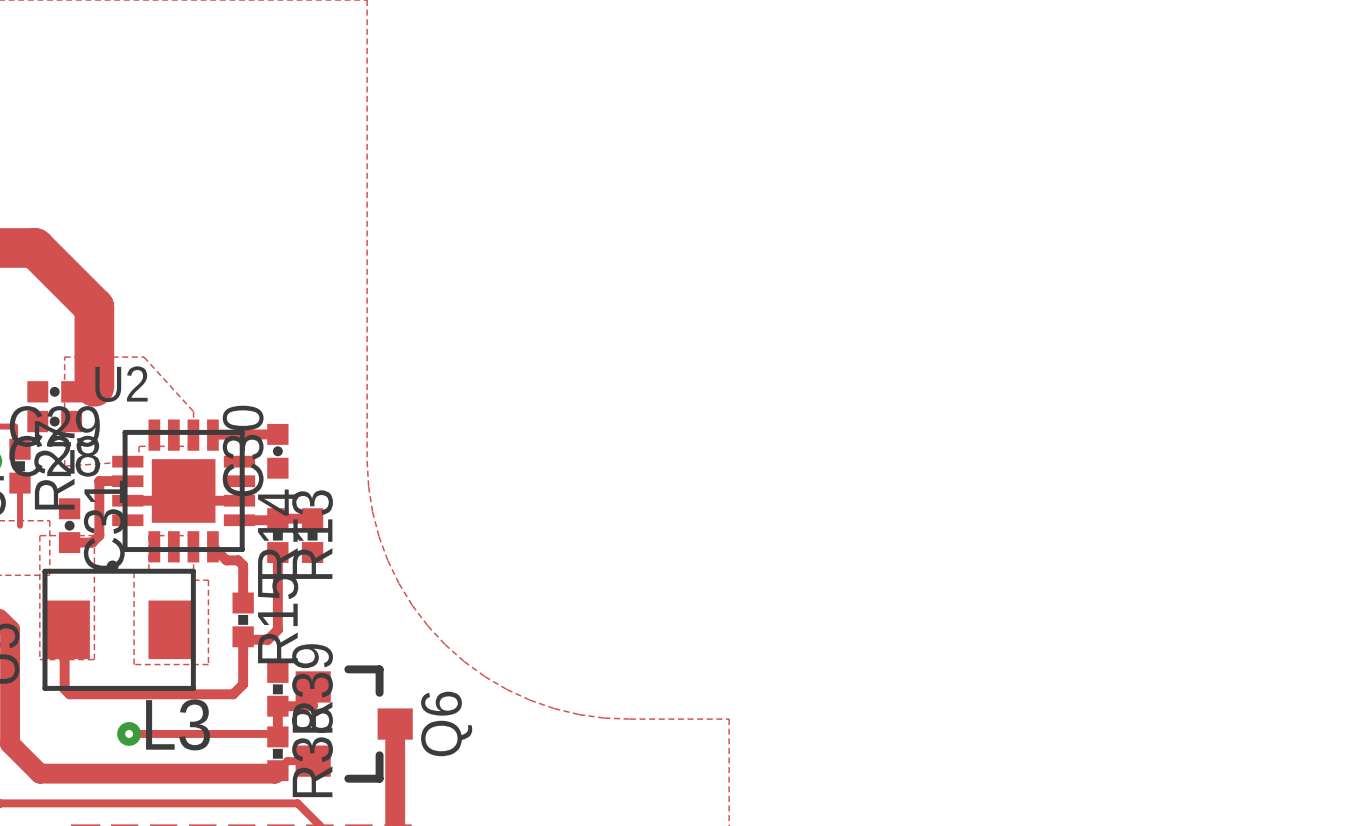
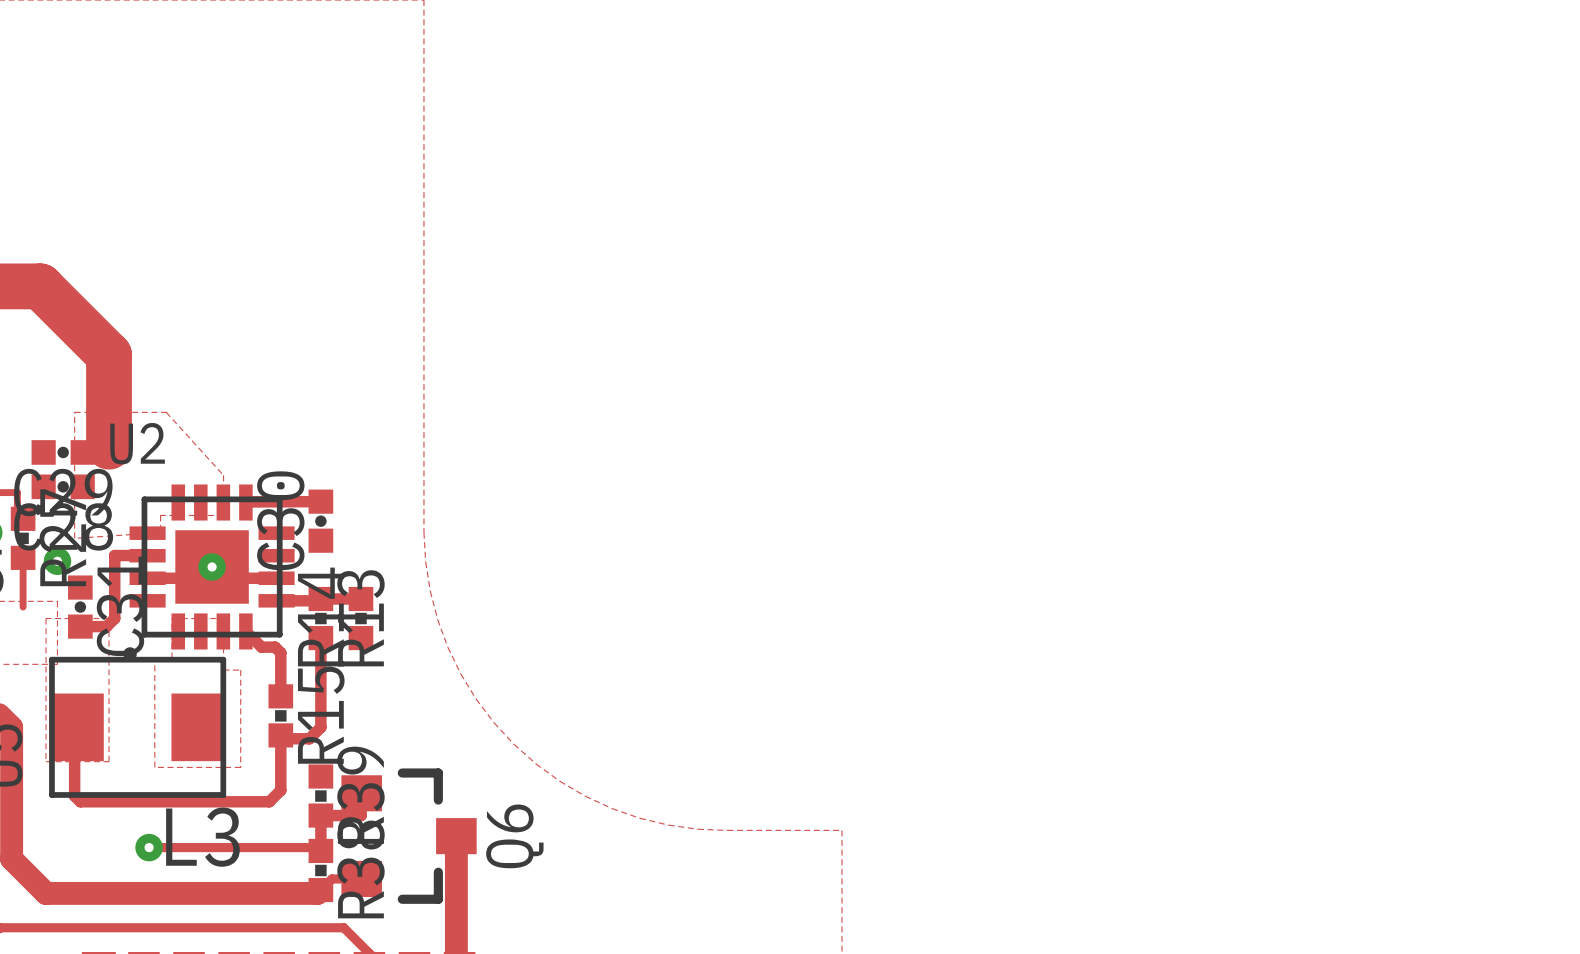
via: none -> (57, 561)
via: none -> (212, 566)

